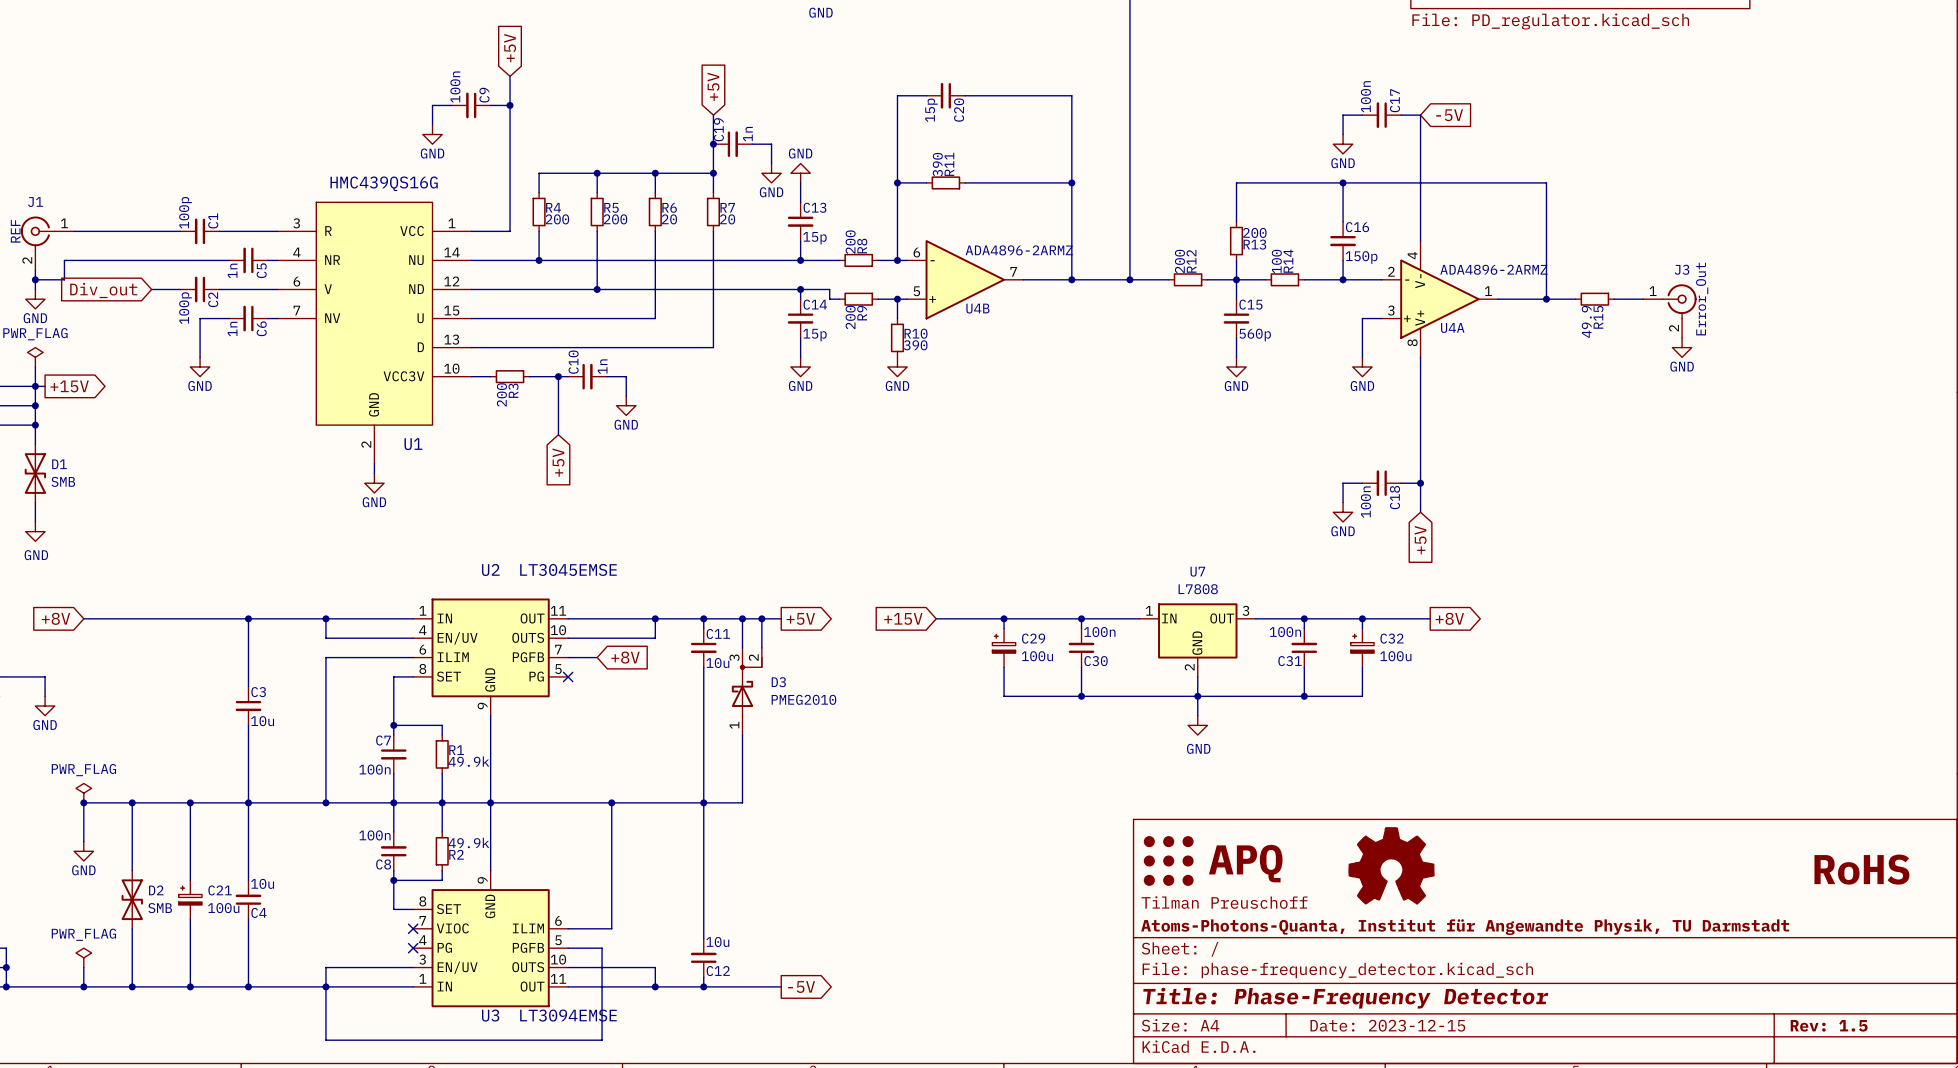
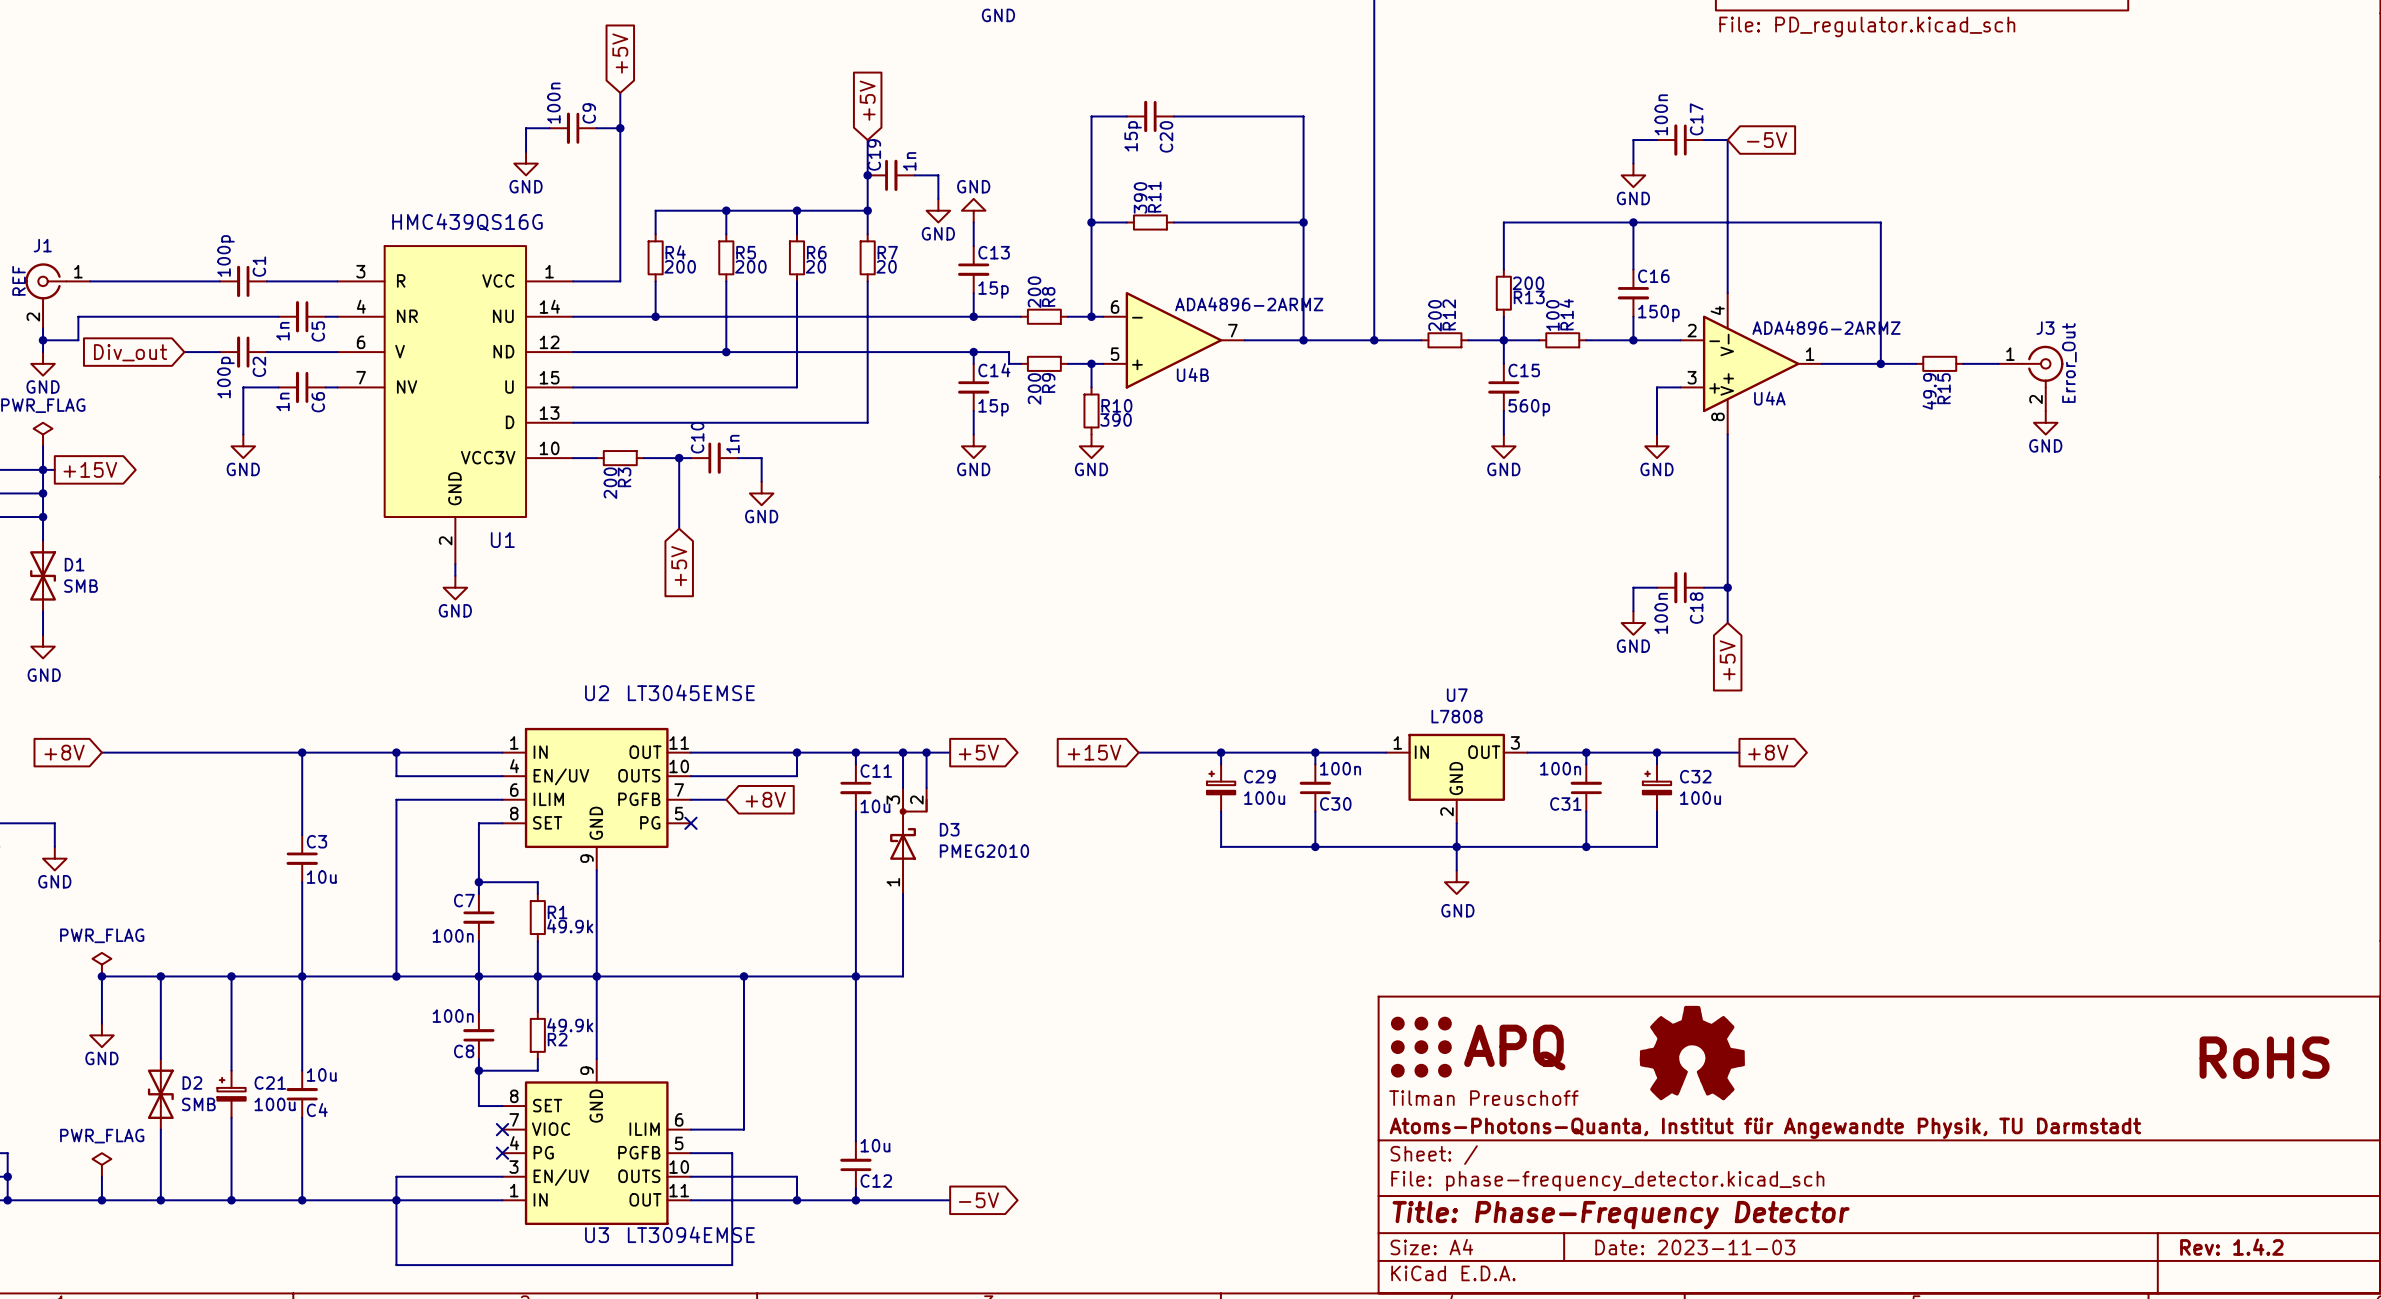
title block: Date: 2023-12-15 (1387, 1025) -> Date: 2023-11-03 (1695, 1247)
title block: Rev: 1.5 (1829, 1025) -> Rev: 1.4.2 (2231, 1247)

